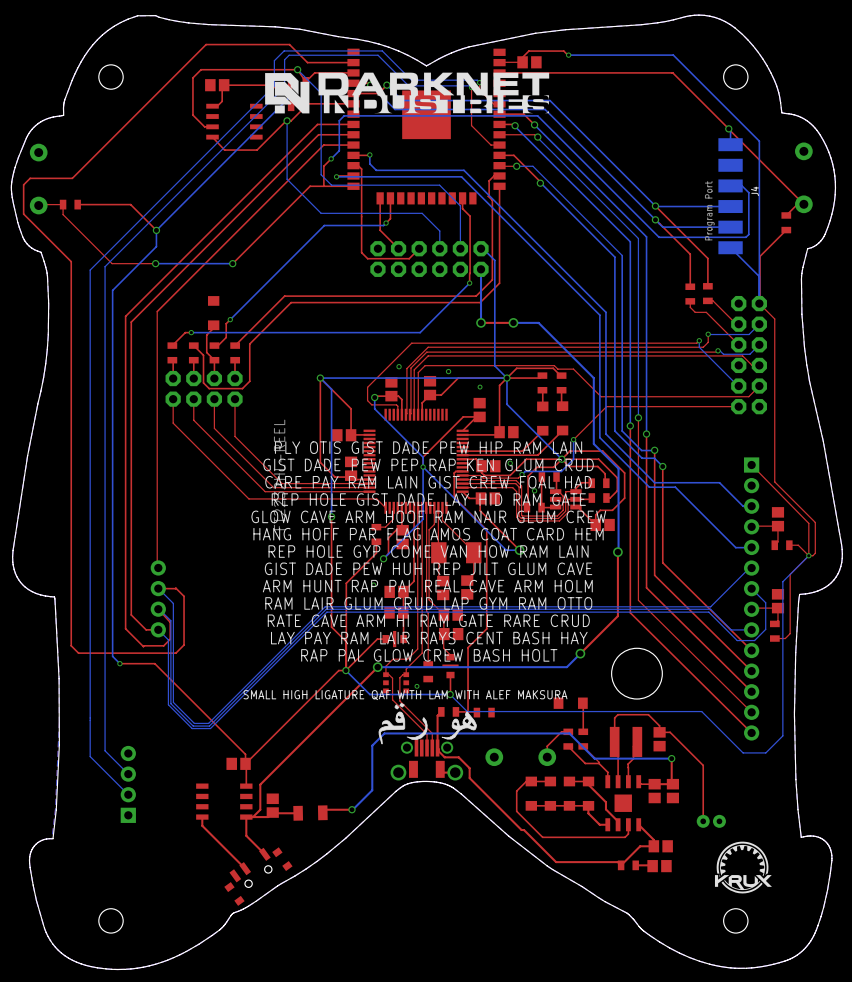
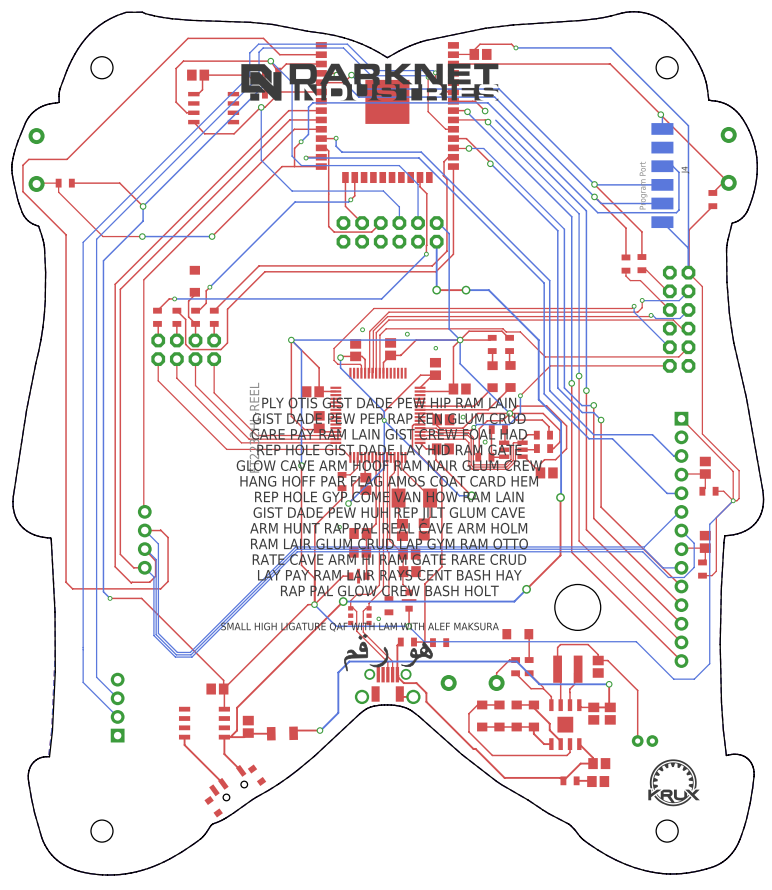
bottom track: (534, 124) (646, 236) -> (495, 120) (586, 212)

